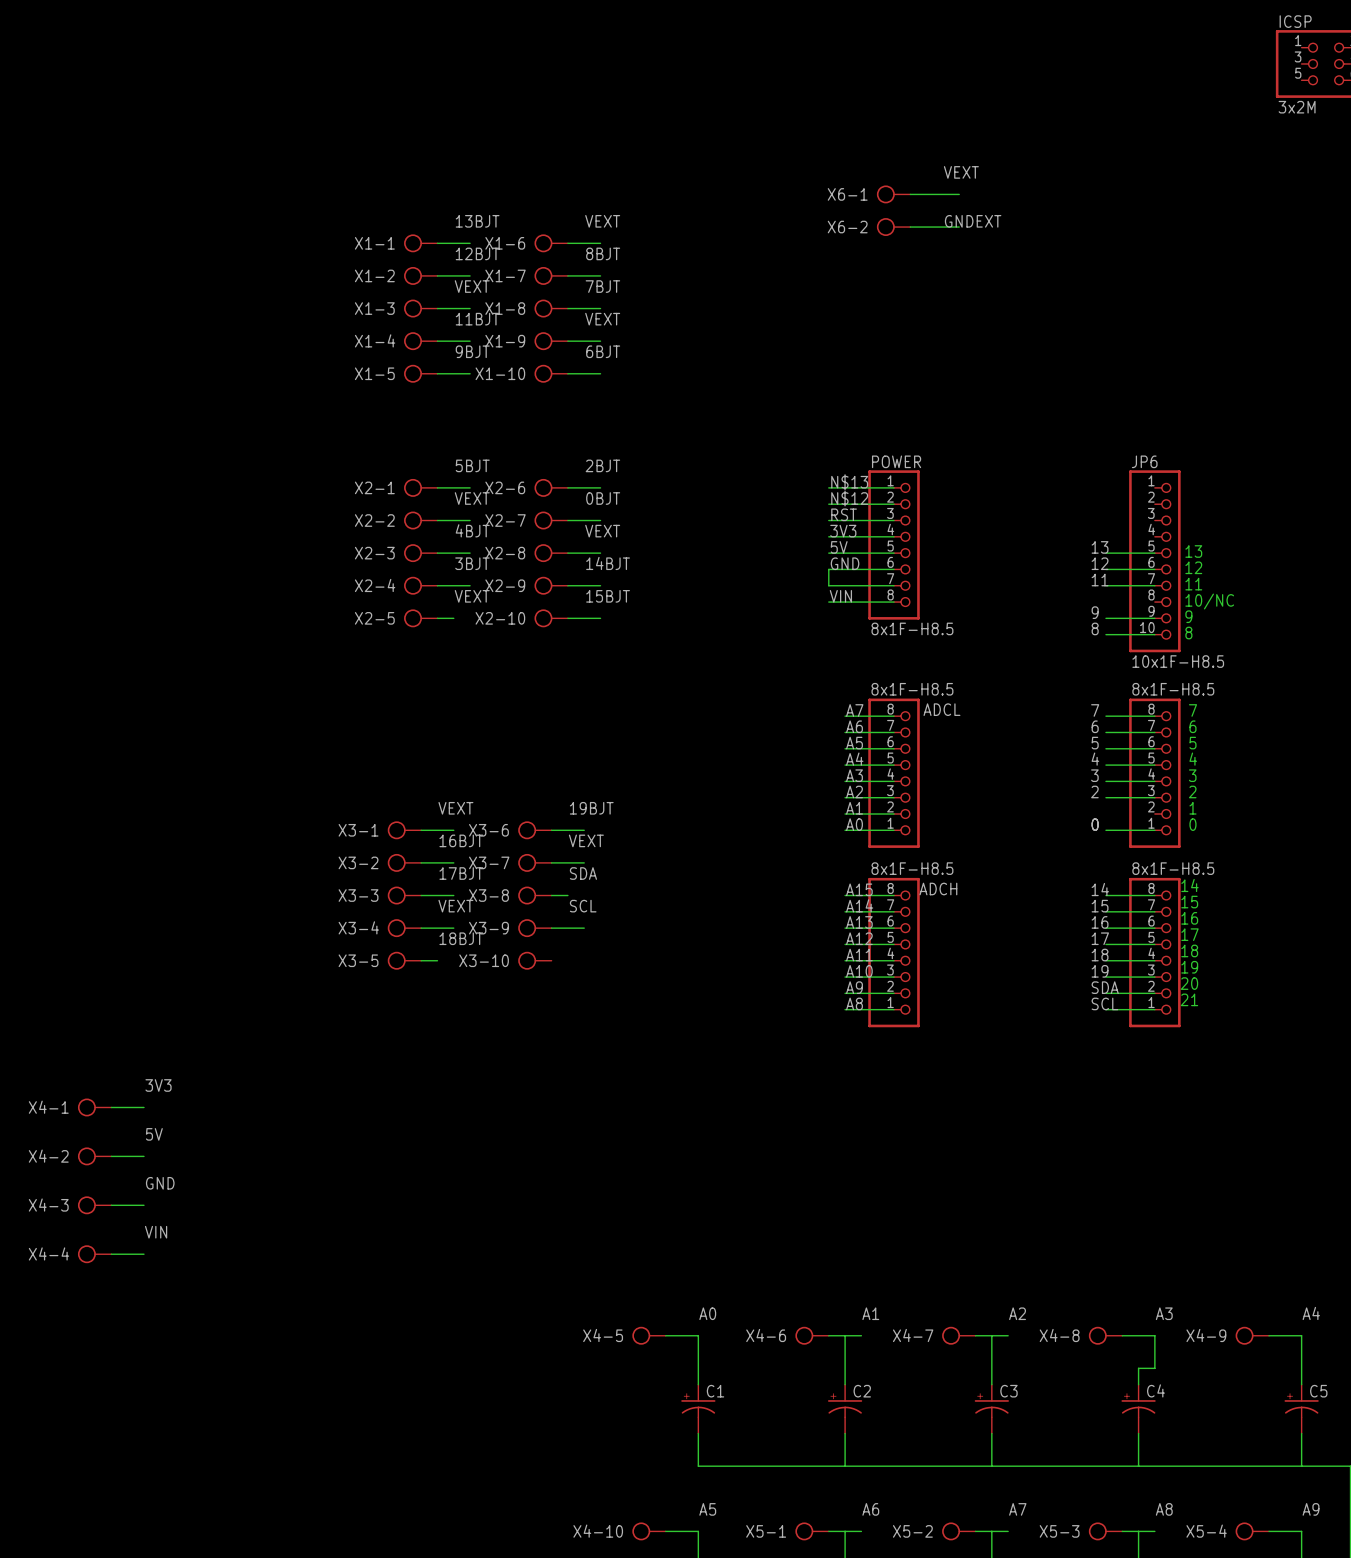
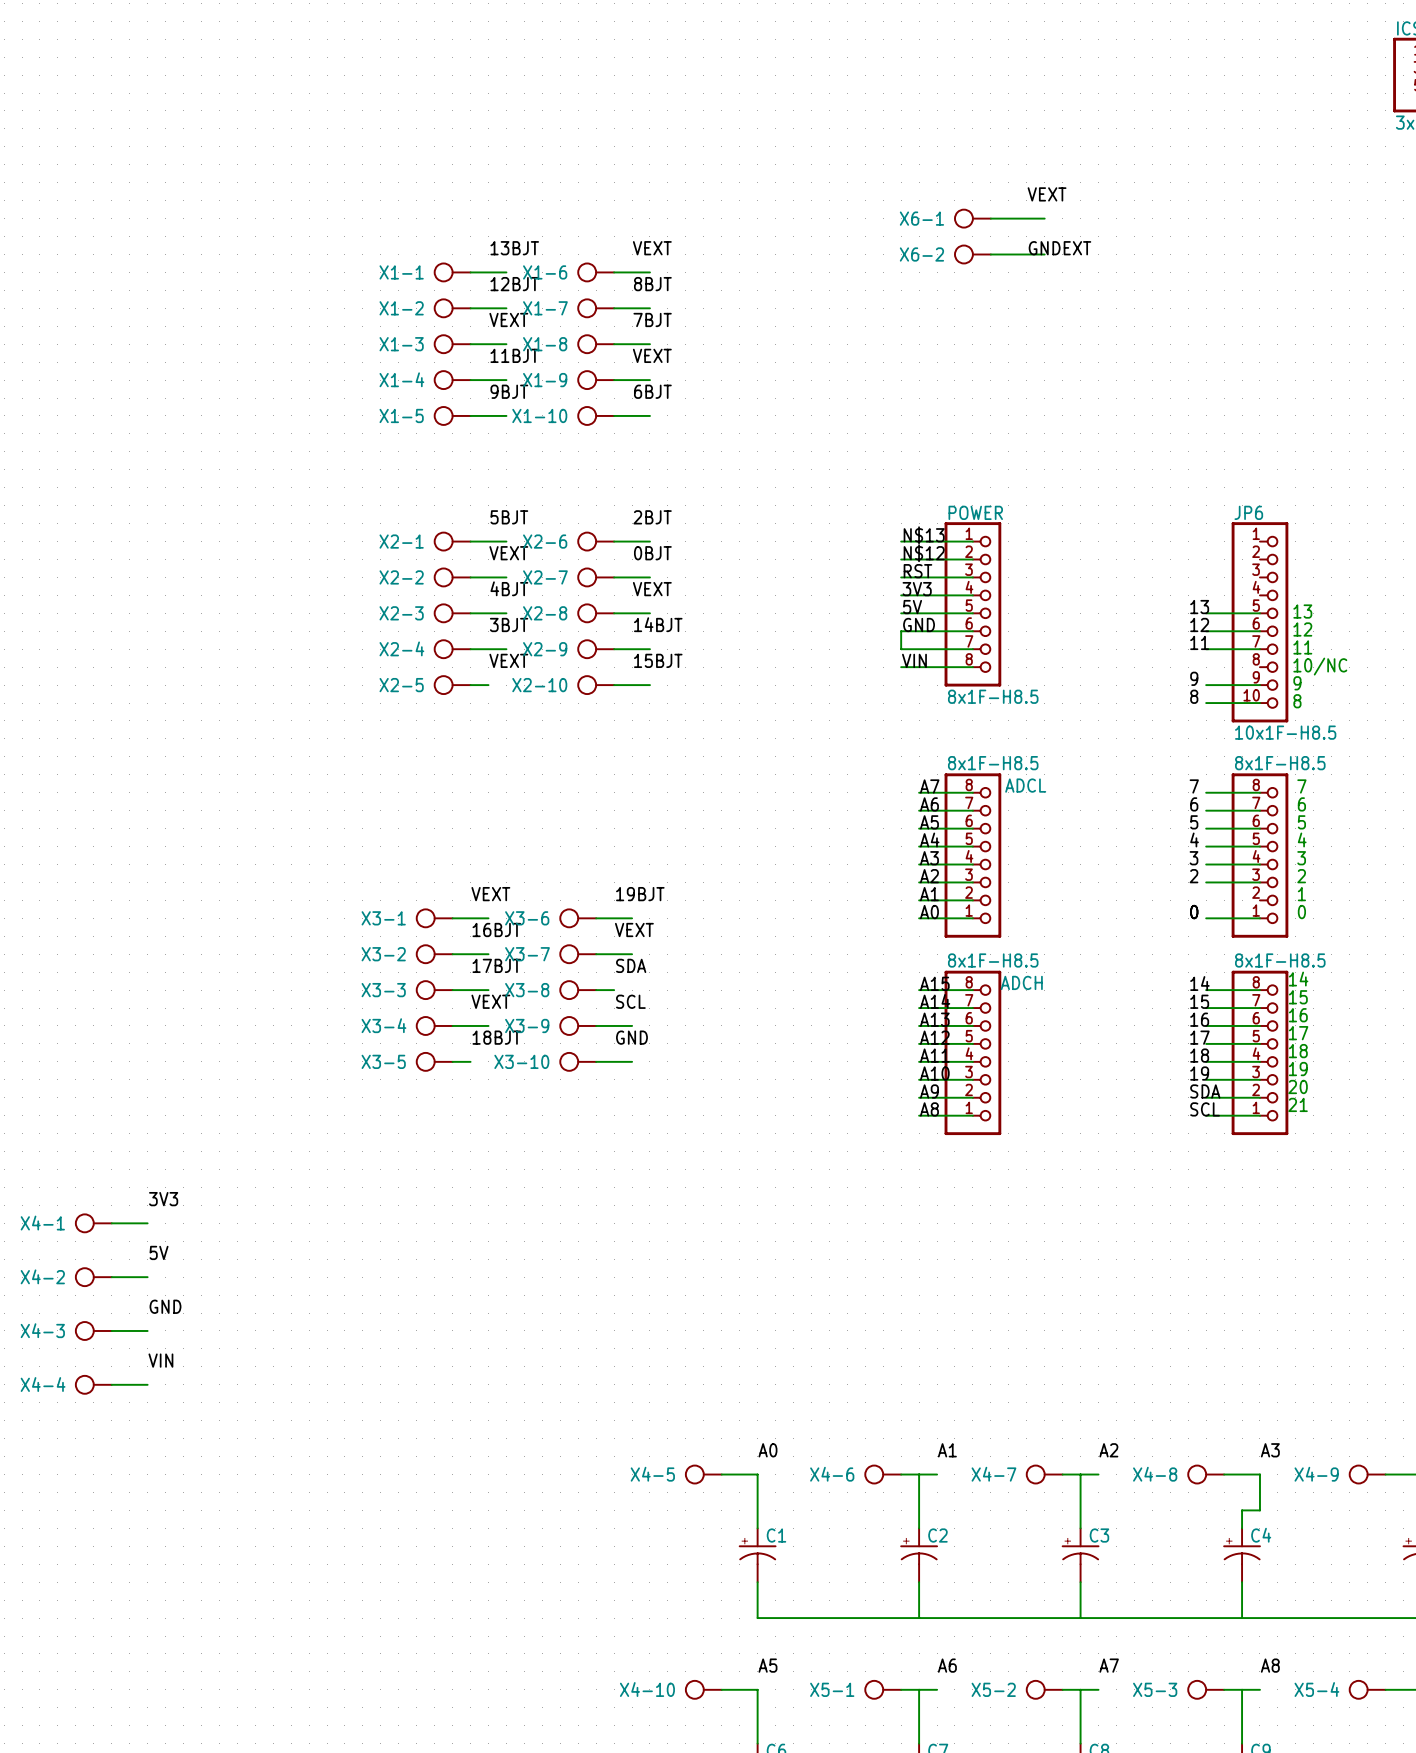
label: none -> GND (631, 1037)
wire: none -> (596, 1061) (632, 1061)

